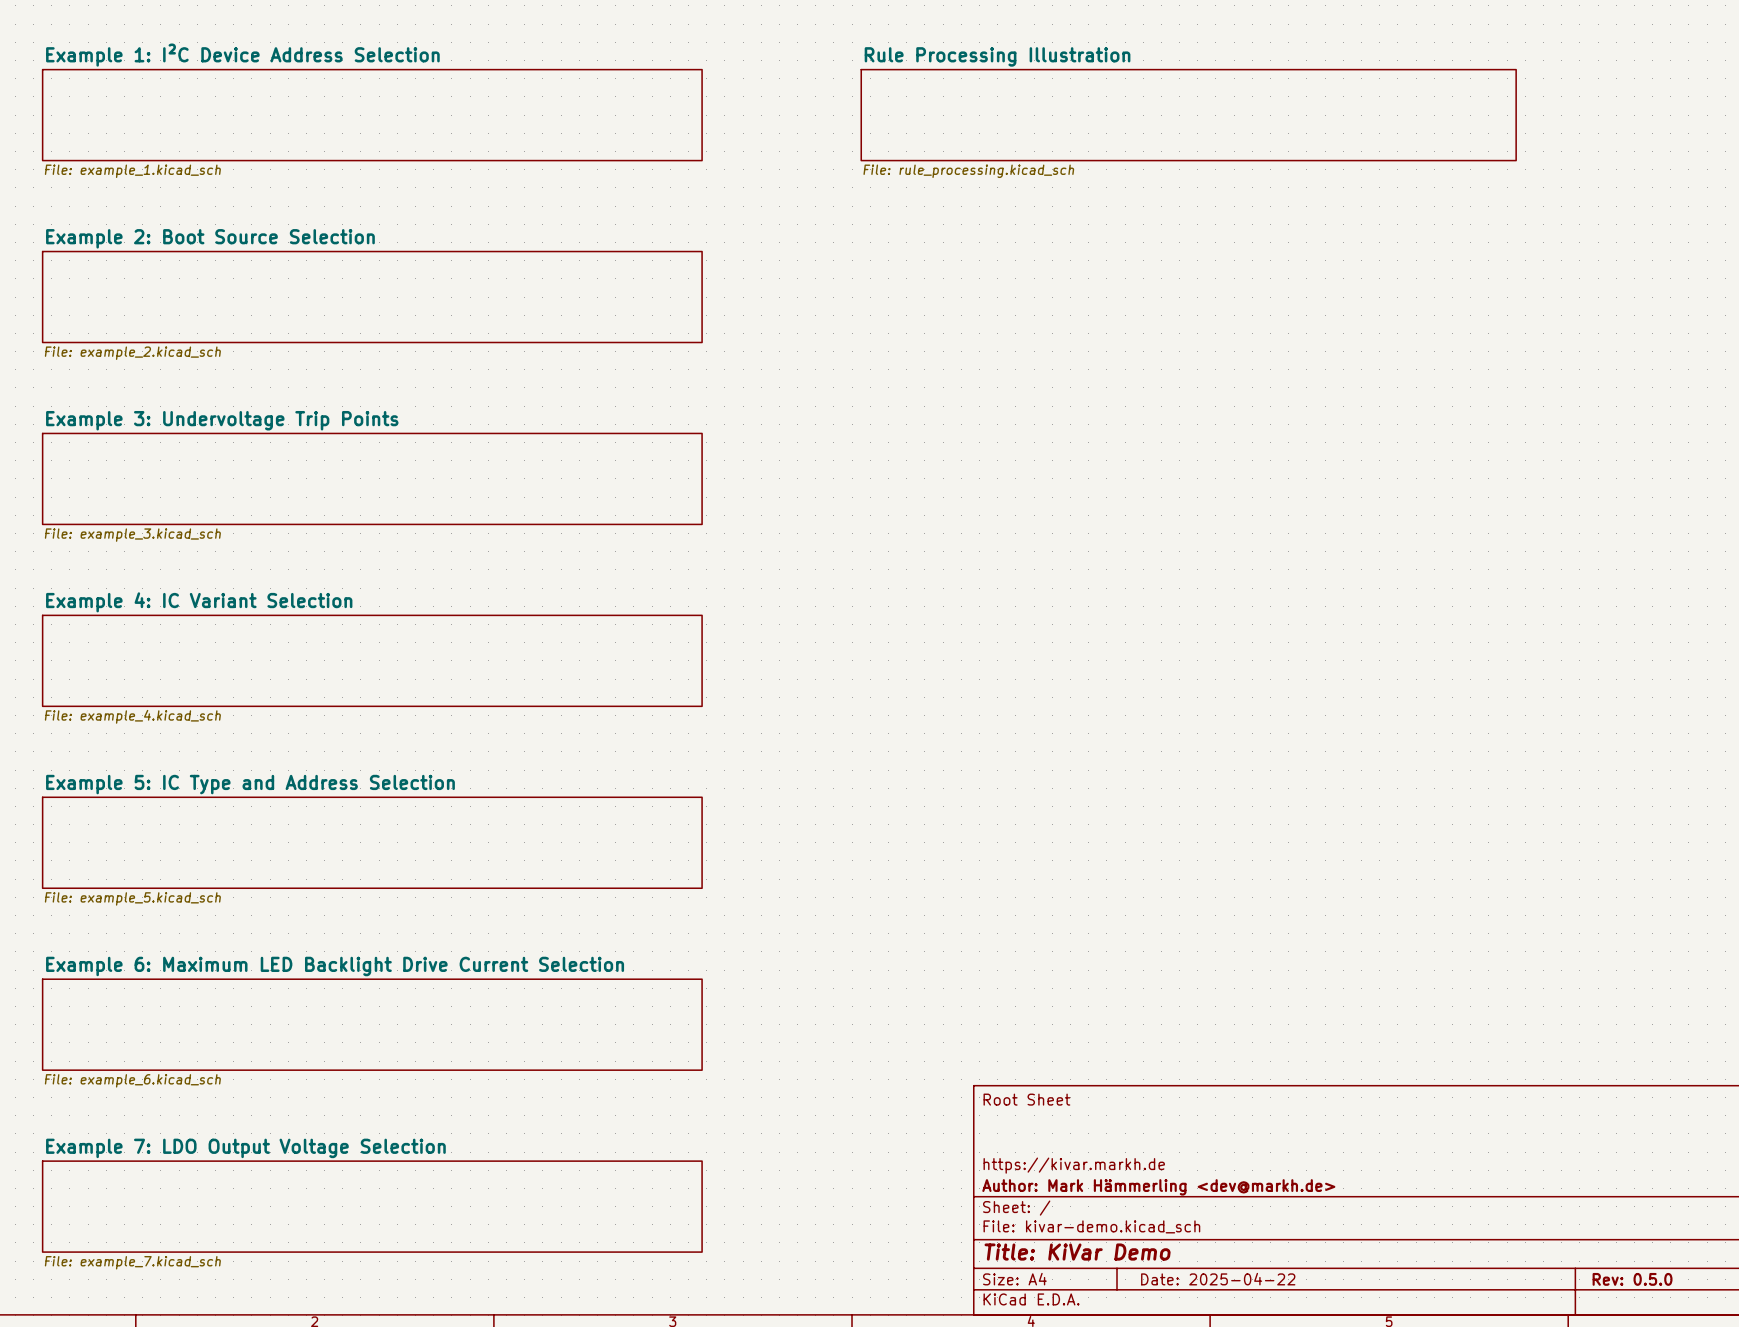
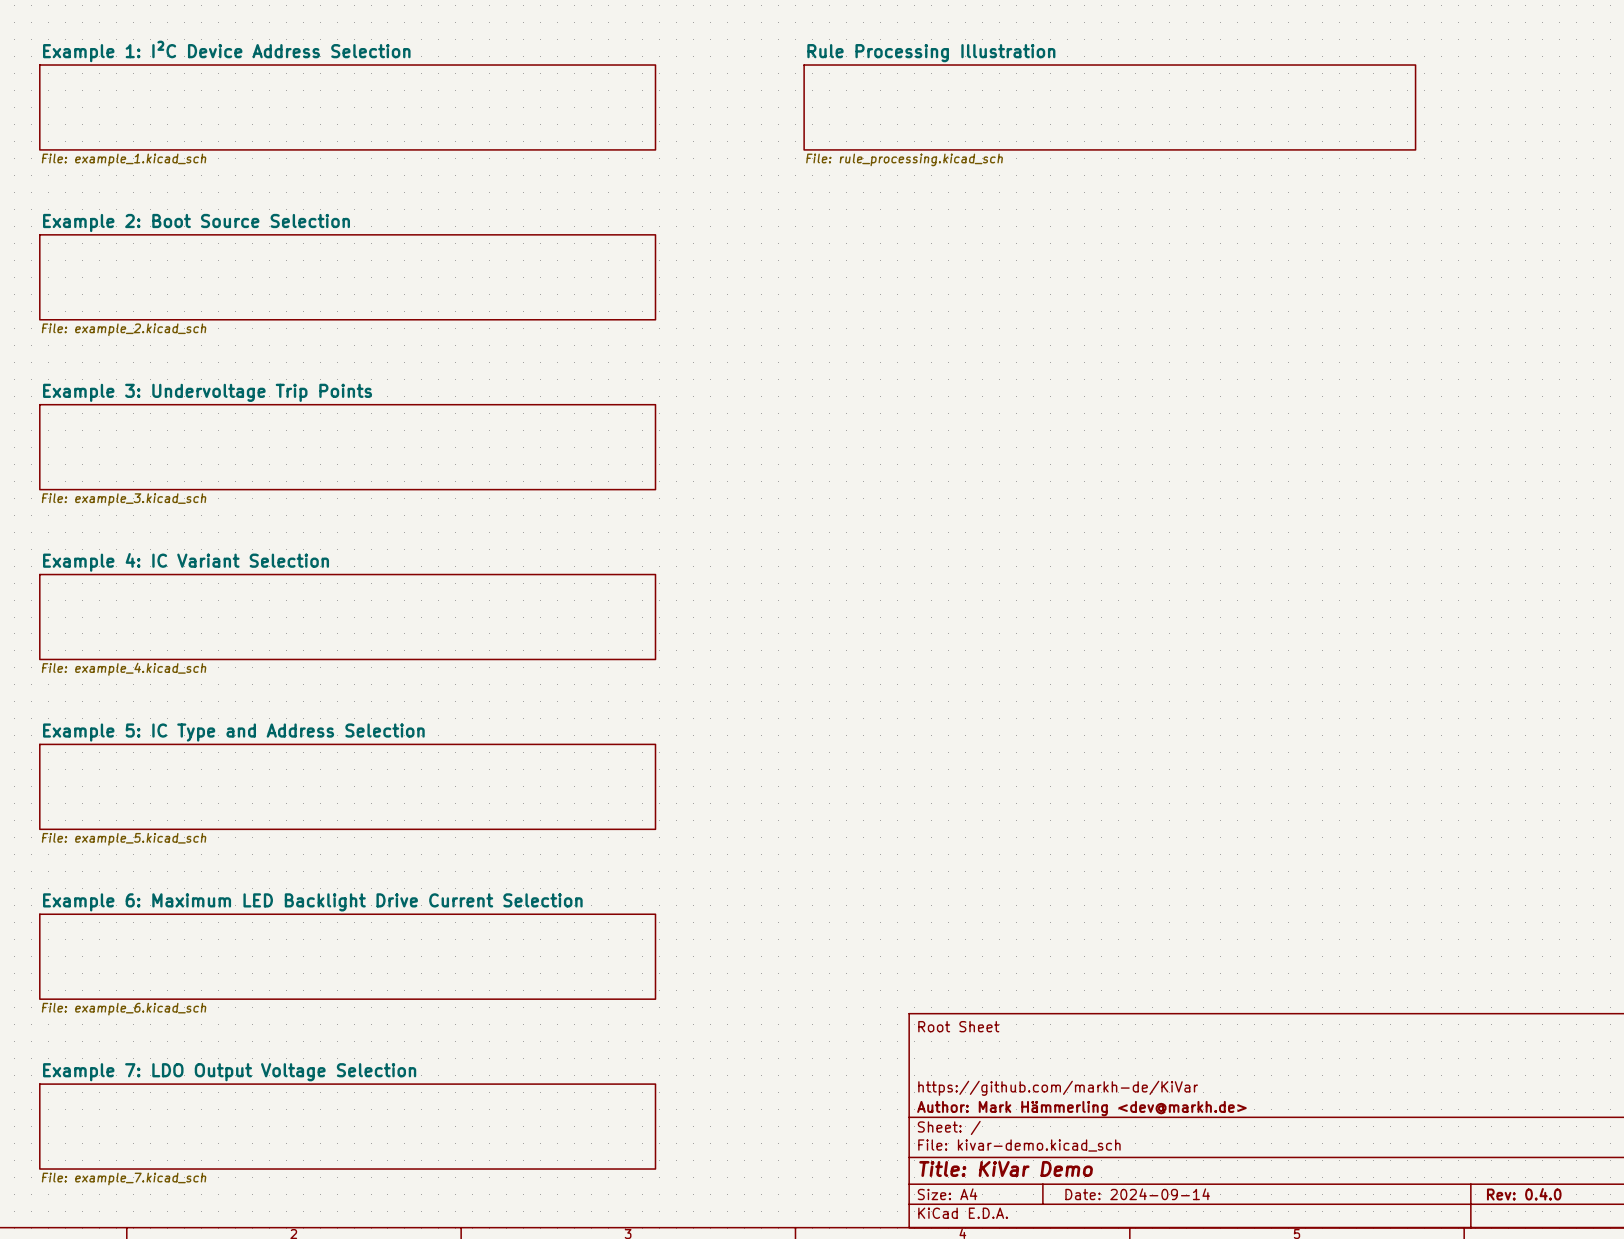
title block: https://kivar.markh.de (1074, 1165) -> https://github.com/markh-de/KiVar (1058, 1088)
title block: Date: 2025-04-22 (1218, 1279) -> Date: 2024-09-14 (1137, 1194)
title block: Rev: 0.5.0 (1632, 1279) -> Rev: 0.4.0 (1524, 1194)

